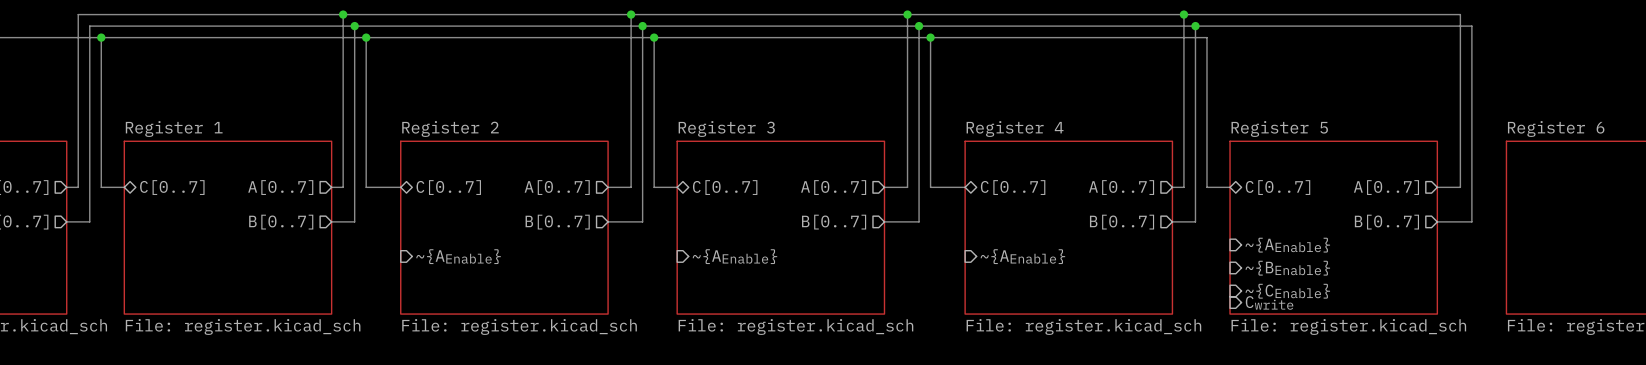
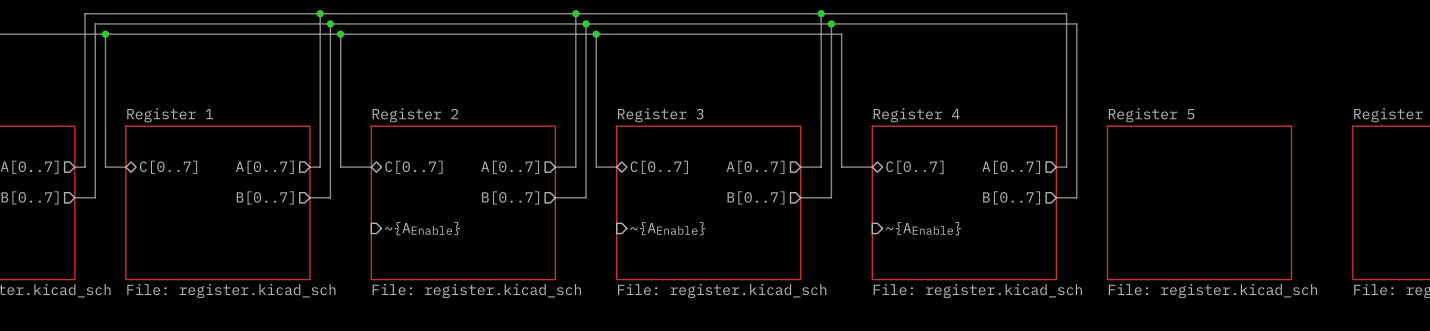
bus: (1183, 14) (1460, 14) (1460, 187) (1437, 187) -> none
junction: (1183, 14) -> none
bus: (1195, 26) (1471, 26) (1471, 221) (1437, 221) -> none
junction: (1195, 26) -> none
bus: (930, 37) (1206, 37) (1206, 187) (1230, 187) -> none
junction: (930, 37) -> none
sheet pin: C[0..7] (1278, 187) -> none
sheet pin: A[0..7] (1386, 187) -> none
sheet pin: B[0..7] (1386, 222) -> none
sheet pin: ~{AEnable} (1287, 245) -> none
sheet pin: ~{BEnable} (1287, 268) -> none
sheet pin: ~{CEnable} (1287, 291) -> none
sheet pin: Cwrite (1269, 302) -> none

